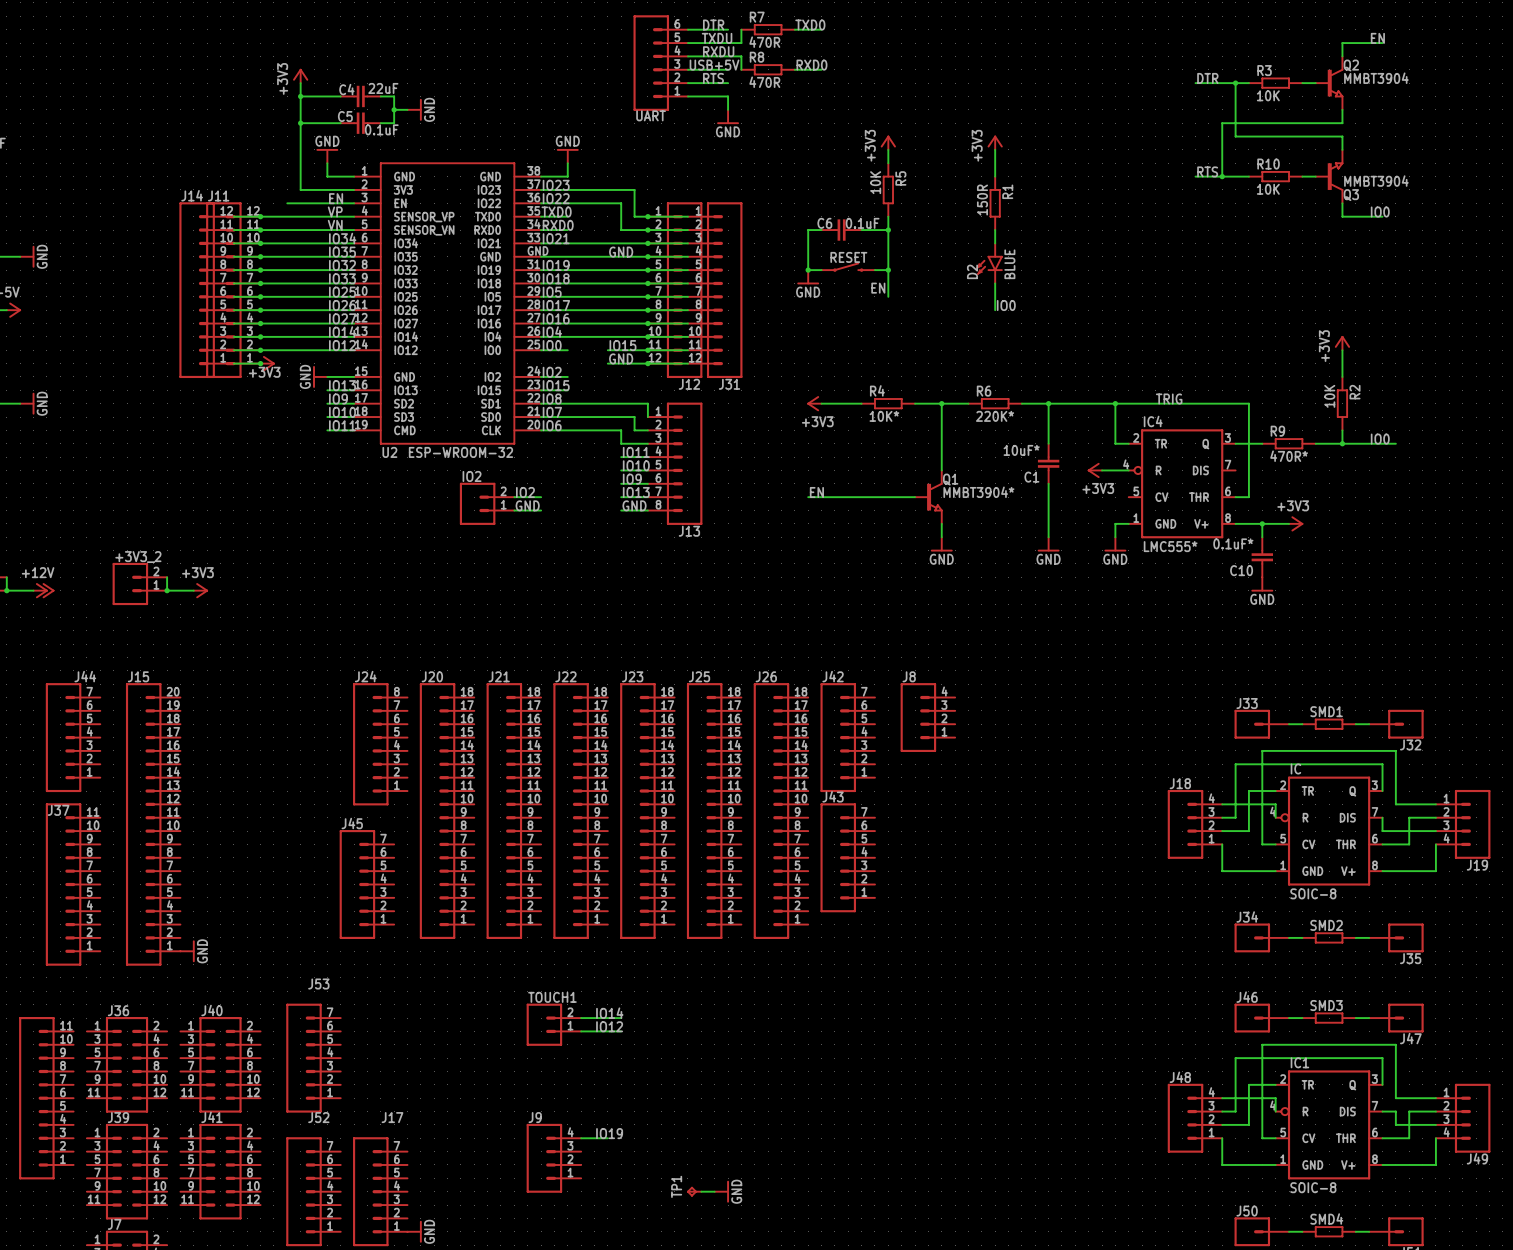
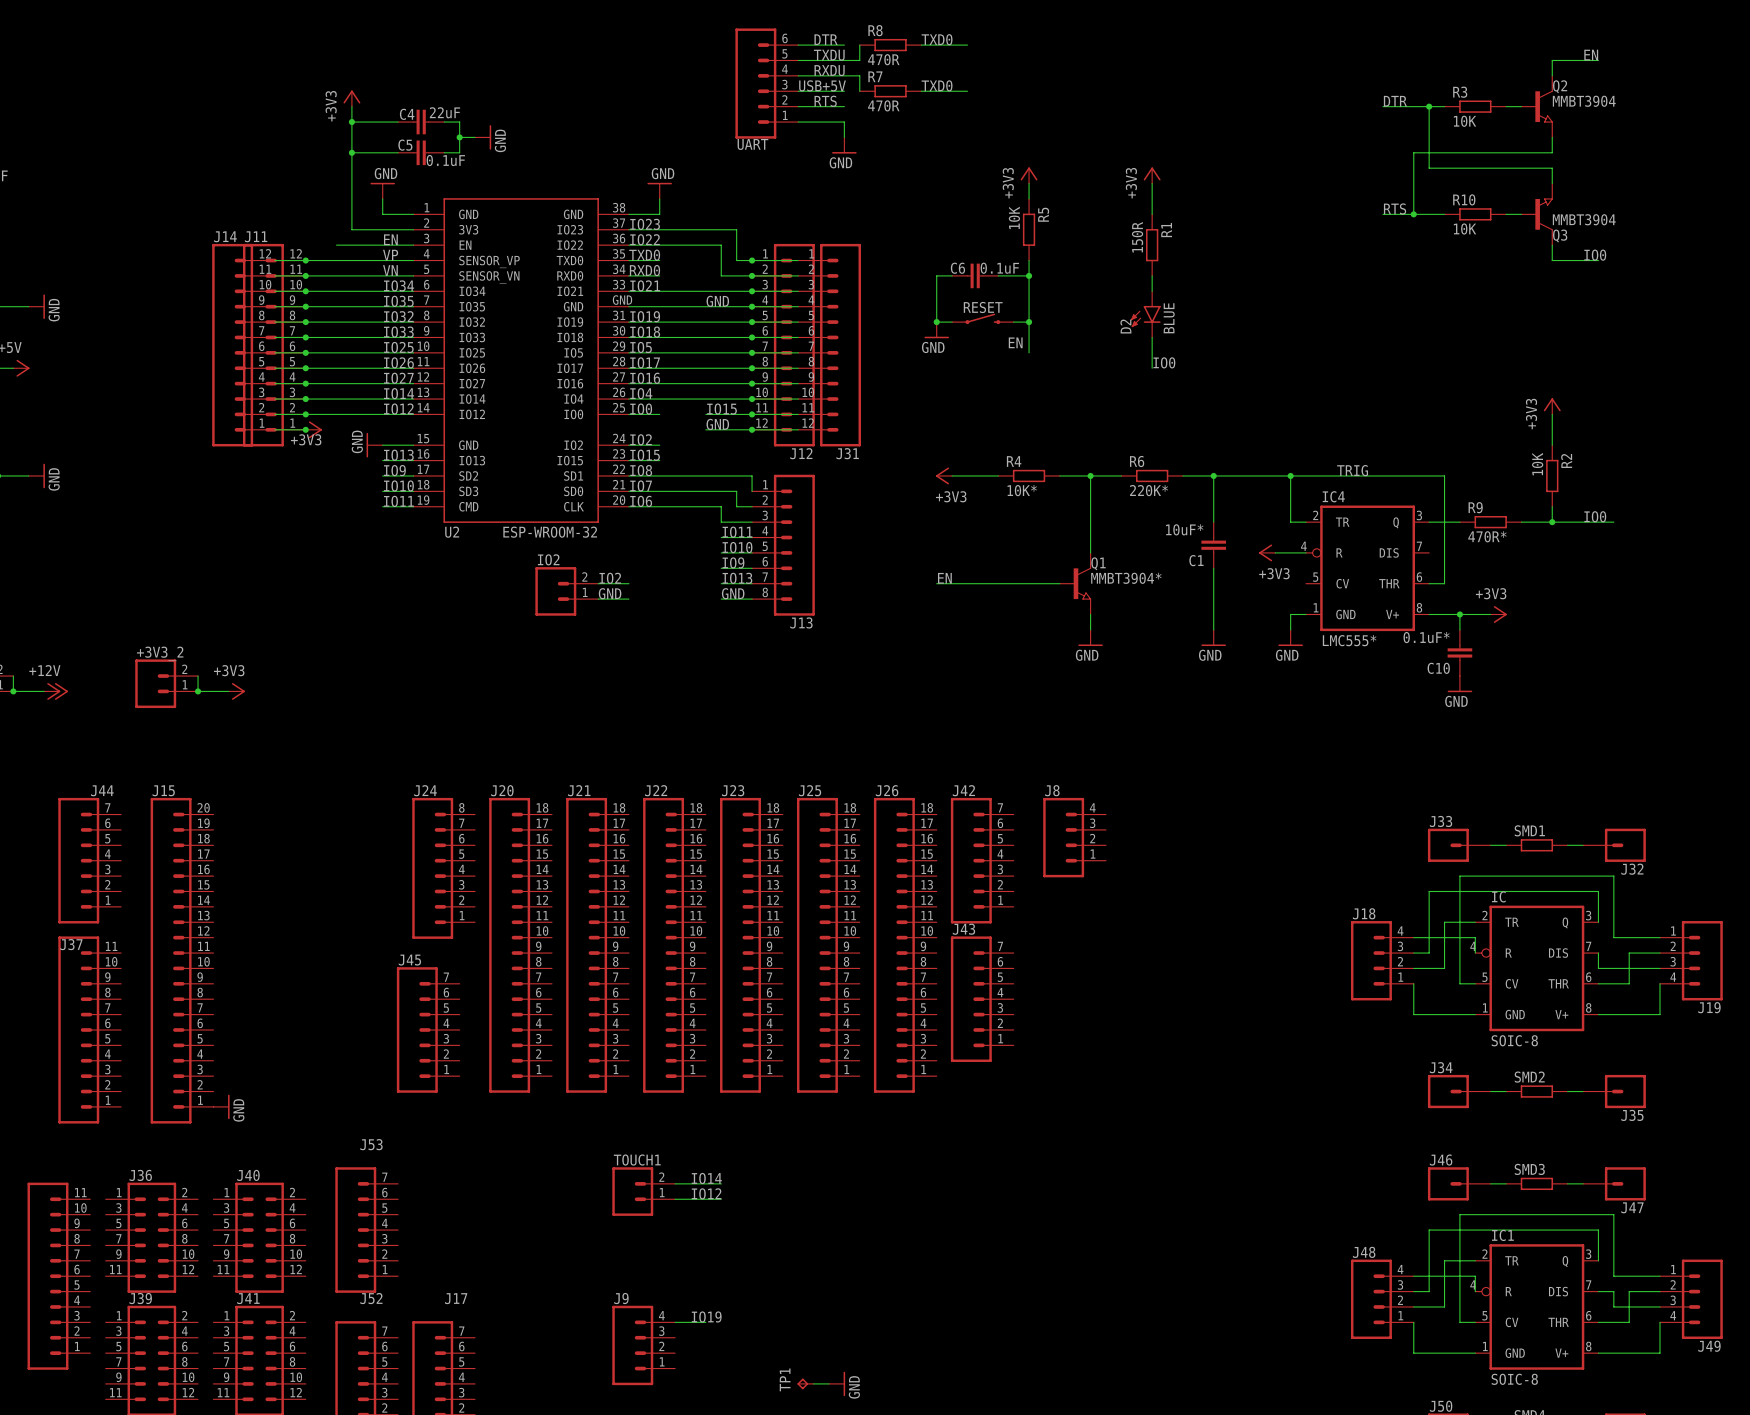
R7 name: R7 (757, 17) -> R8 (875, 30)
wire: none -> (952, 45) (967, 45)
R8 name: R8 (756, 57) -> R7 (875, 76)
label: RXD0 (811, 65) -> TXD0 (937, 85)
wire: none -> (952, 91) (967, 91)

